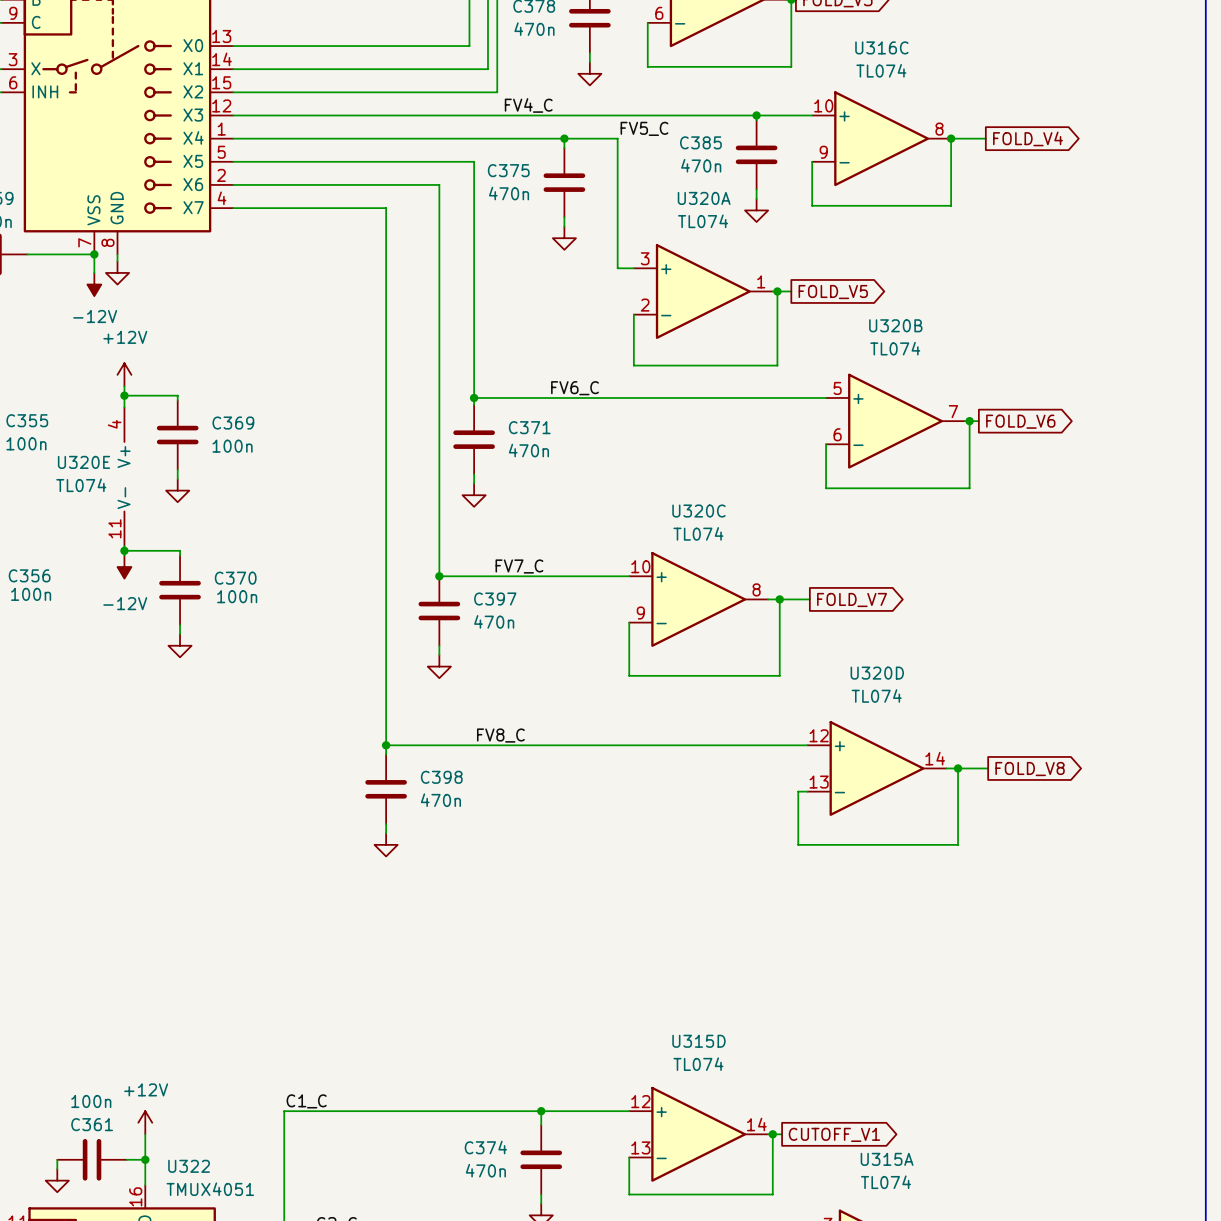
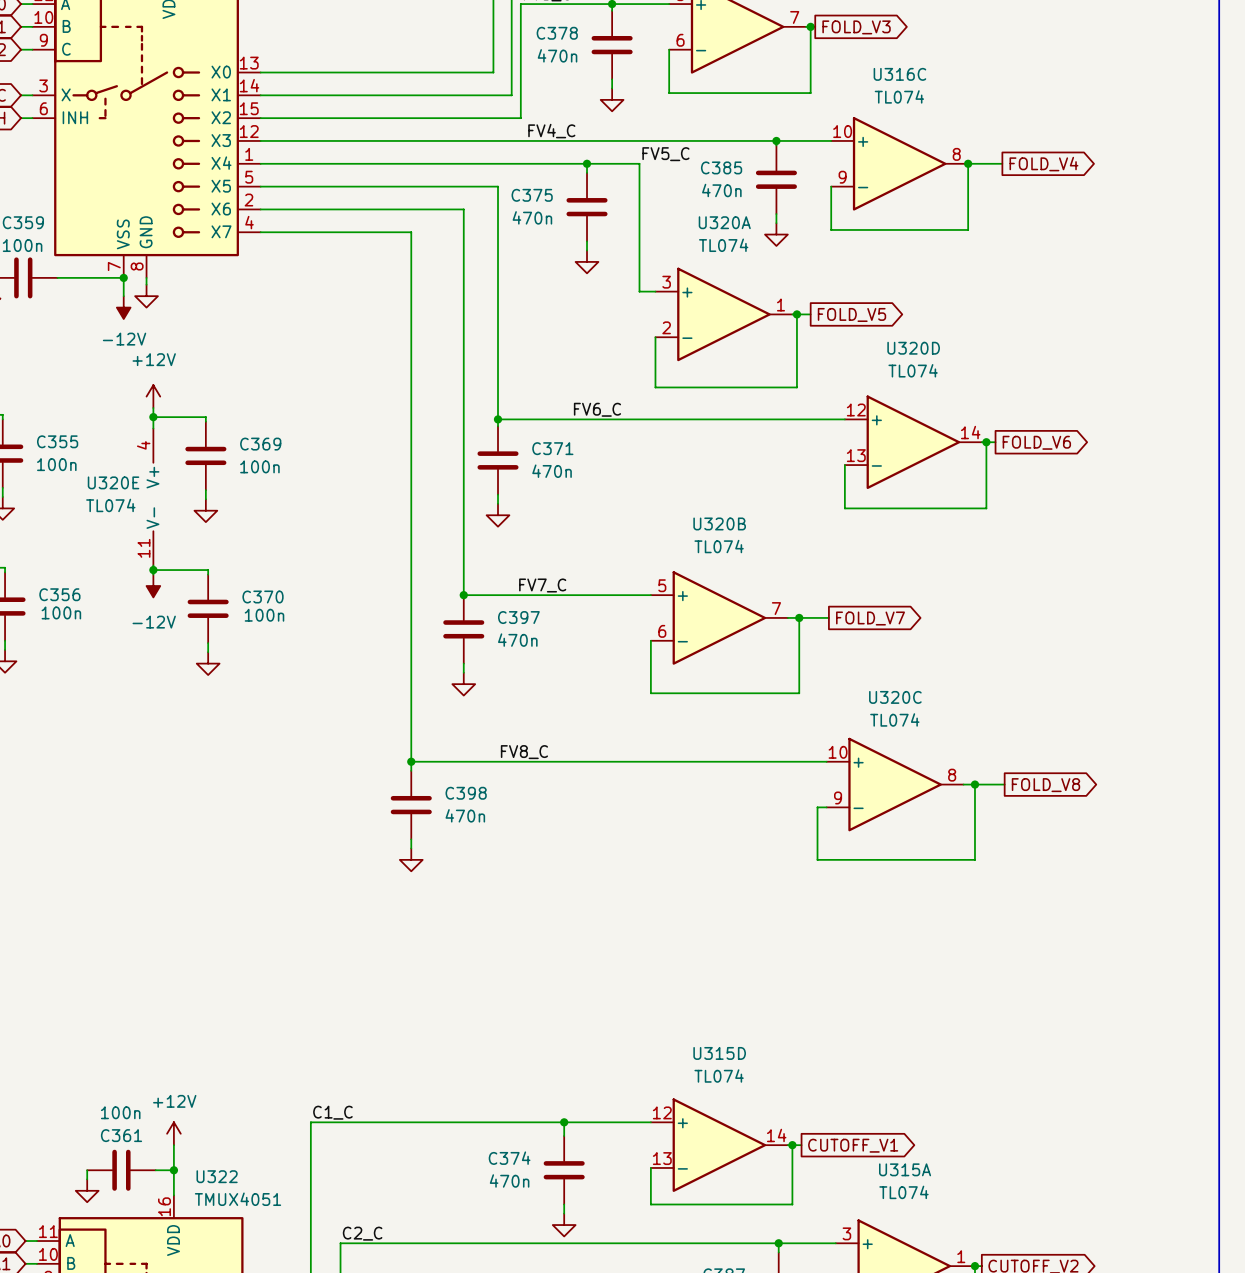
U320B position: (895, 421) -> (719, 617)
U320C position: (698, 599) -> (895, 784)
U320D position: (877, 768) -> (913, 442)

